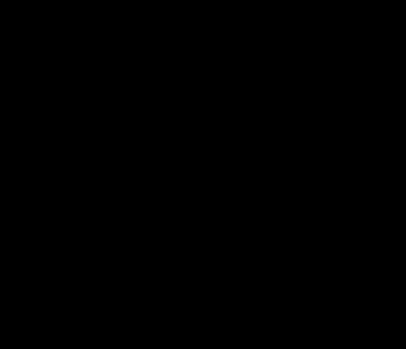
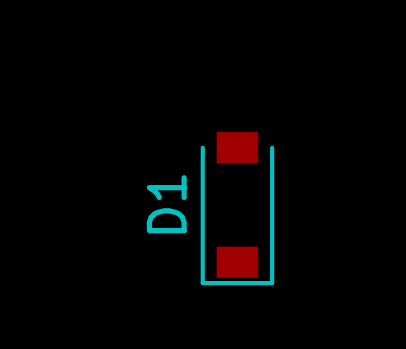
D1: none -> (237, 208)

